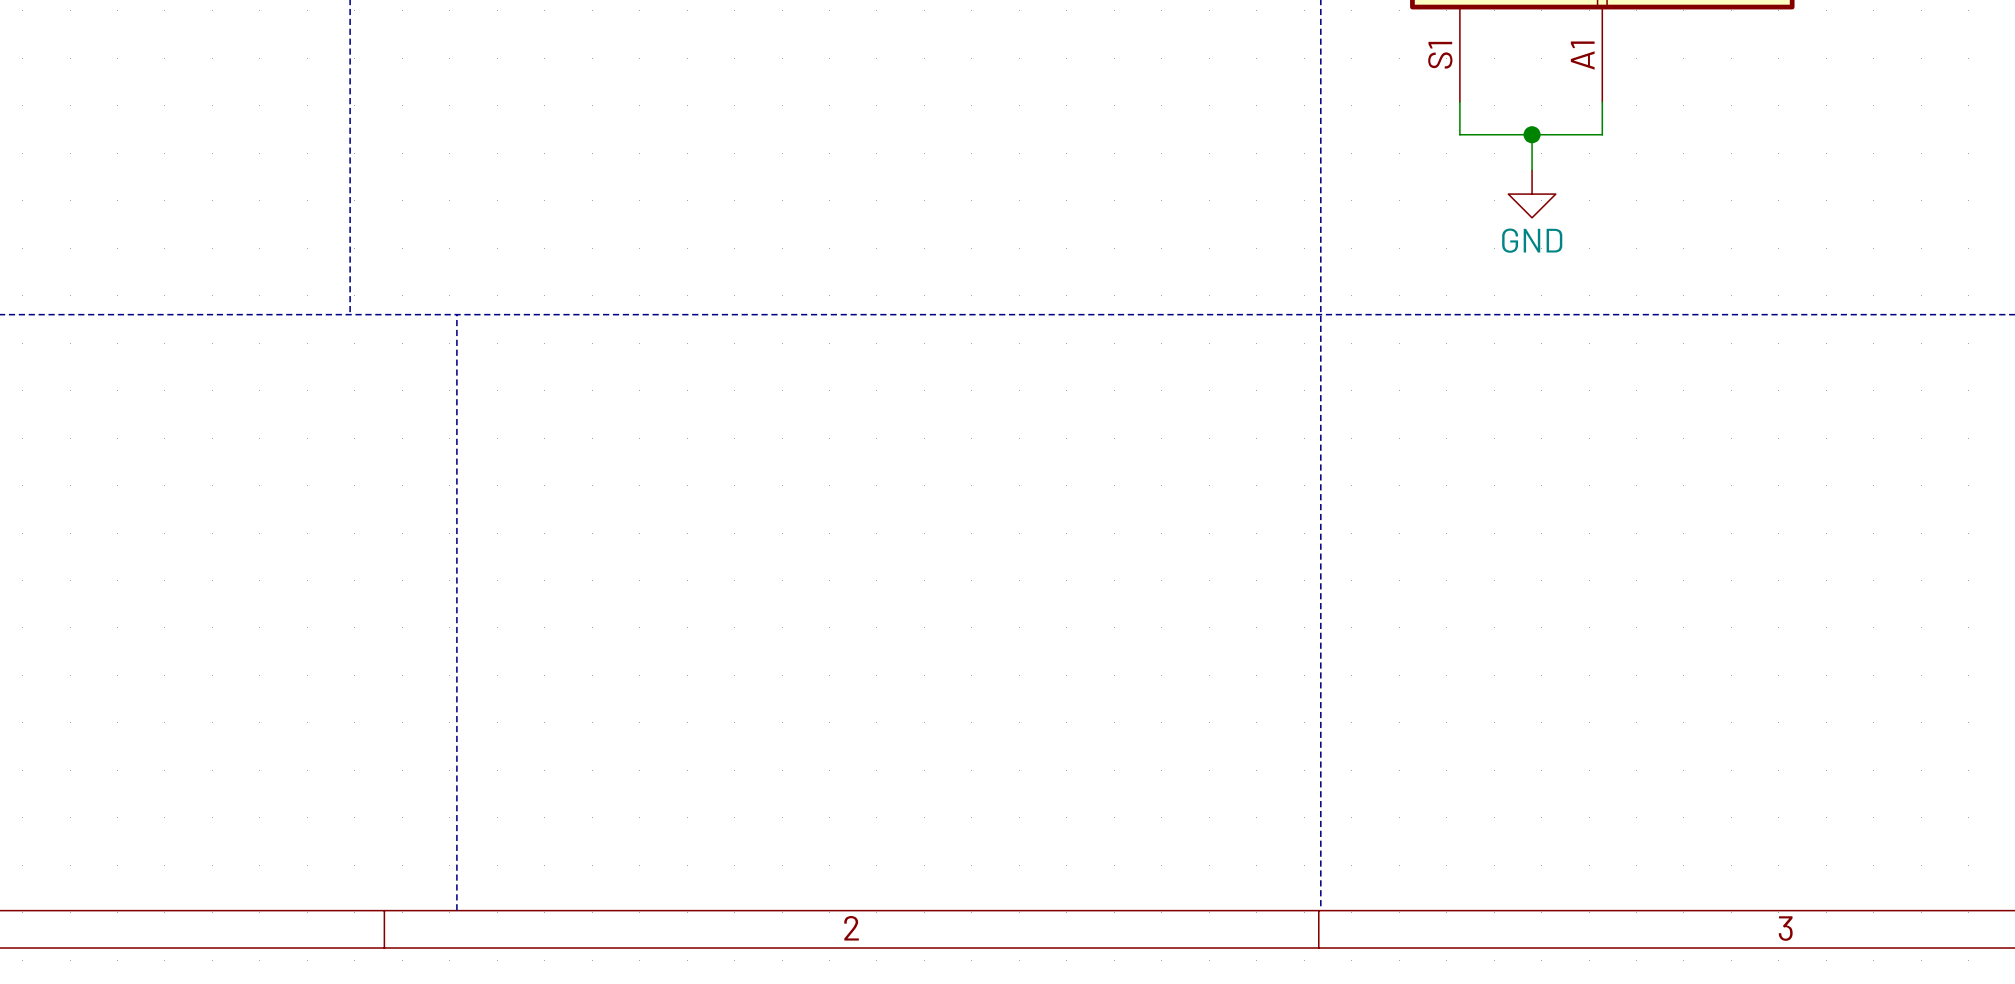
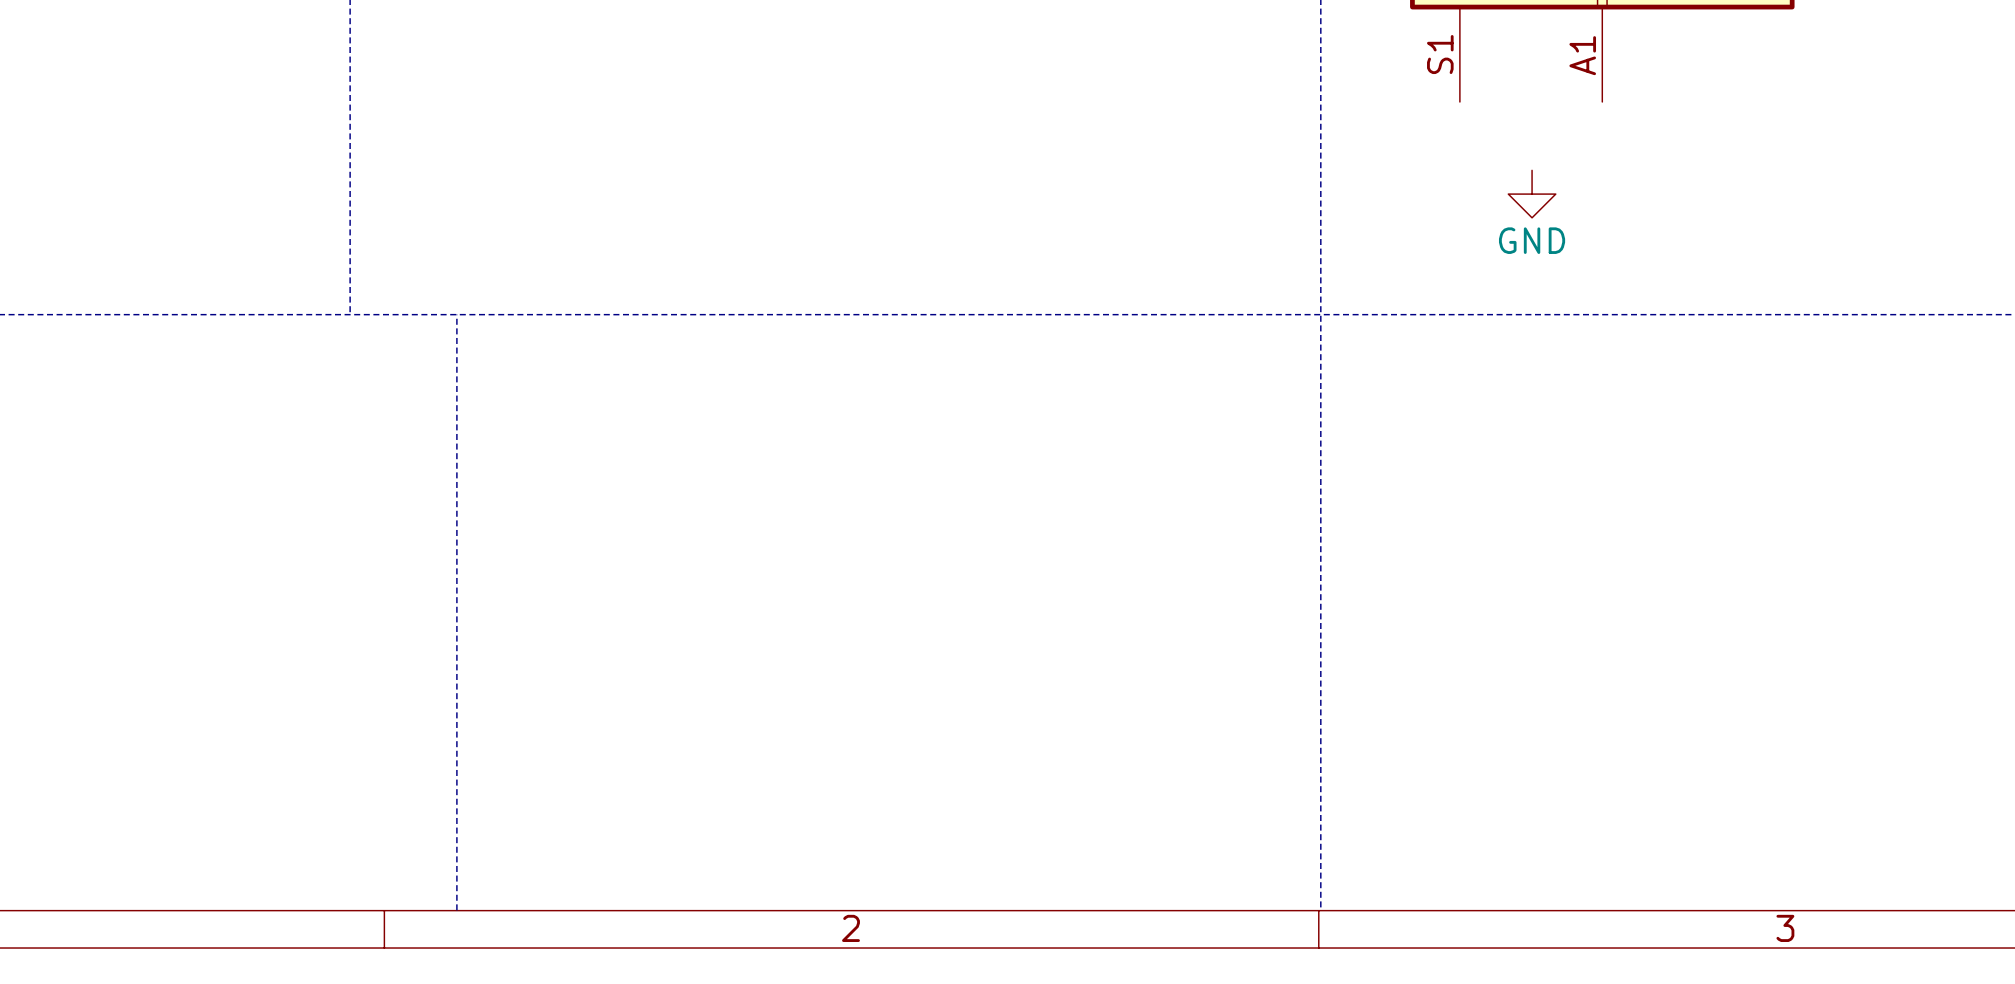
wire: (1459, 101) (1459, 134) (1602, 134) (1602, 101) -> none
wire: (1532, 134) (1532, 170) -> none
junction: (1532, 134) -> none

